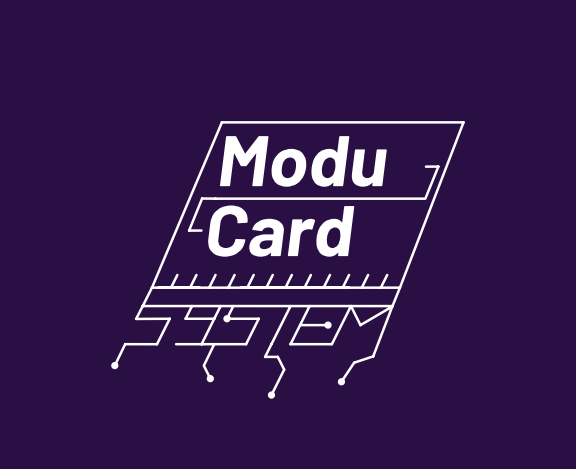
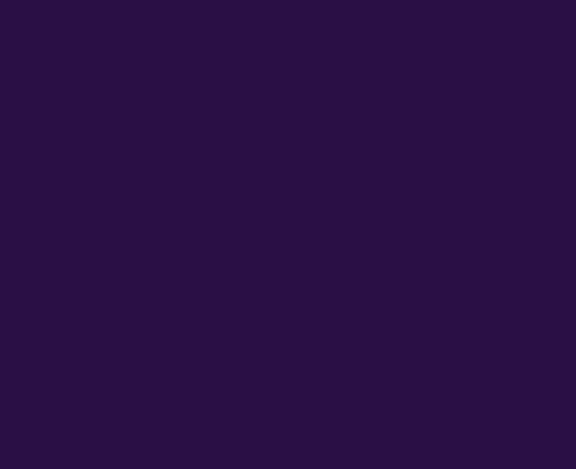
text: Modu (303, 161) -> none
line: (425, 166) (438, 166) (425, 198) -> none
line: (423, 198) (202, 198) (189, 230) (201, 230) -> none
text: Card (280, 231) -> none
line: (177, 274) (171, 287) -> none
line: (196, 274) (190, 287) -> none
line: (215, 274) (209, 287) -> none
line: (234, 274) (228, 287) -> none
line: (253, 274) (247, 287) -> none
line: (272, 274) (266, 287) -> none
line: (291, 274) (285, 287) -> none
line: (310, 274) (304, 287) -> none
line: (329, 274) (323, 287) -> none
line: (349, 274) (342, 287) -> none
line: (368, 274) (361, 287) -> none
line: (387, 274) (380, 287) -> none
line: (151, 287) (399, 287) -> none
line: (151, 287) (221, 122) (463, 122) (399, 287) -> none
line: (151, 287) (142, 306) -> none
line: (399, 287) (392, 306) (142, 306) -> none
line: (142, 306) (136, 318) (169, 318) (157, 344) (125, 344) (114, 365) -> none
line: (191, 306) (185, 318) (214, 318) -> none
line: (220, 306) (214, 318) -> none
line: (233, 306) (226, 318) (258, 318) (246, 344) -> none
line: (290, 306) (265, 356) (277, 356) (284, 369) (271, 395) -> none
line: (309, 306) (290, 344) (331, 344) (350, 306) (360, 325) (392, 306) (373, 356) (354, 362) (341, 381) -> none
drawing: [223, 315, 231, 323] -> none
line: (214, 318) (201, 344) -> none
drawing: [324, 321, 332, 329] -> none
line: (300, 325) (328, 325) -> none
line: (176, 344) (246, 344) -> none
line: (214, 344) (203, 365) -> none
drawing: [111, 361, 119, 370] -> none
line: (203, 365) (210, 378) -> none
drawing: [206, 375, 214, 383] -> none
drawing: [337, 378, 346, 386] -> none
drawing: [267, 391, 276, 399] -> none

